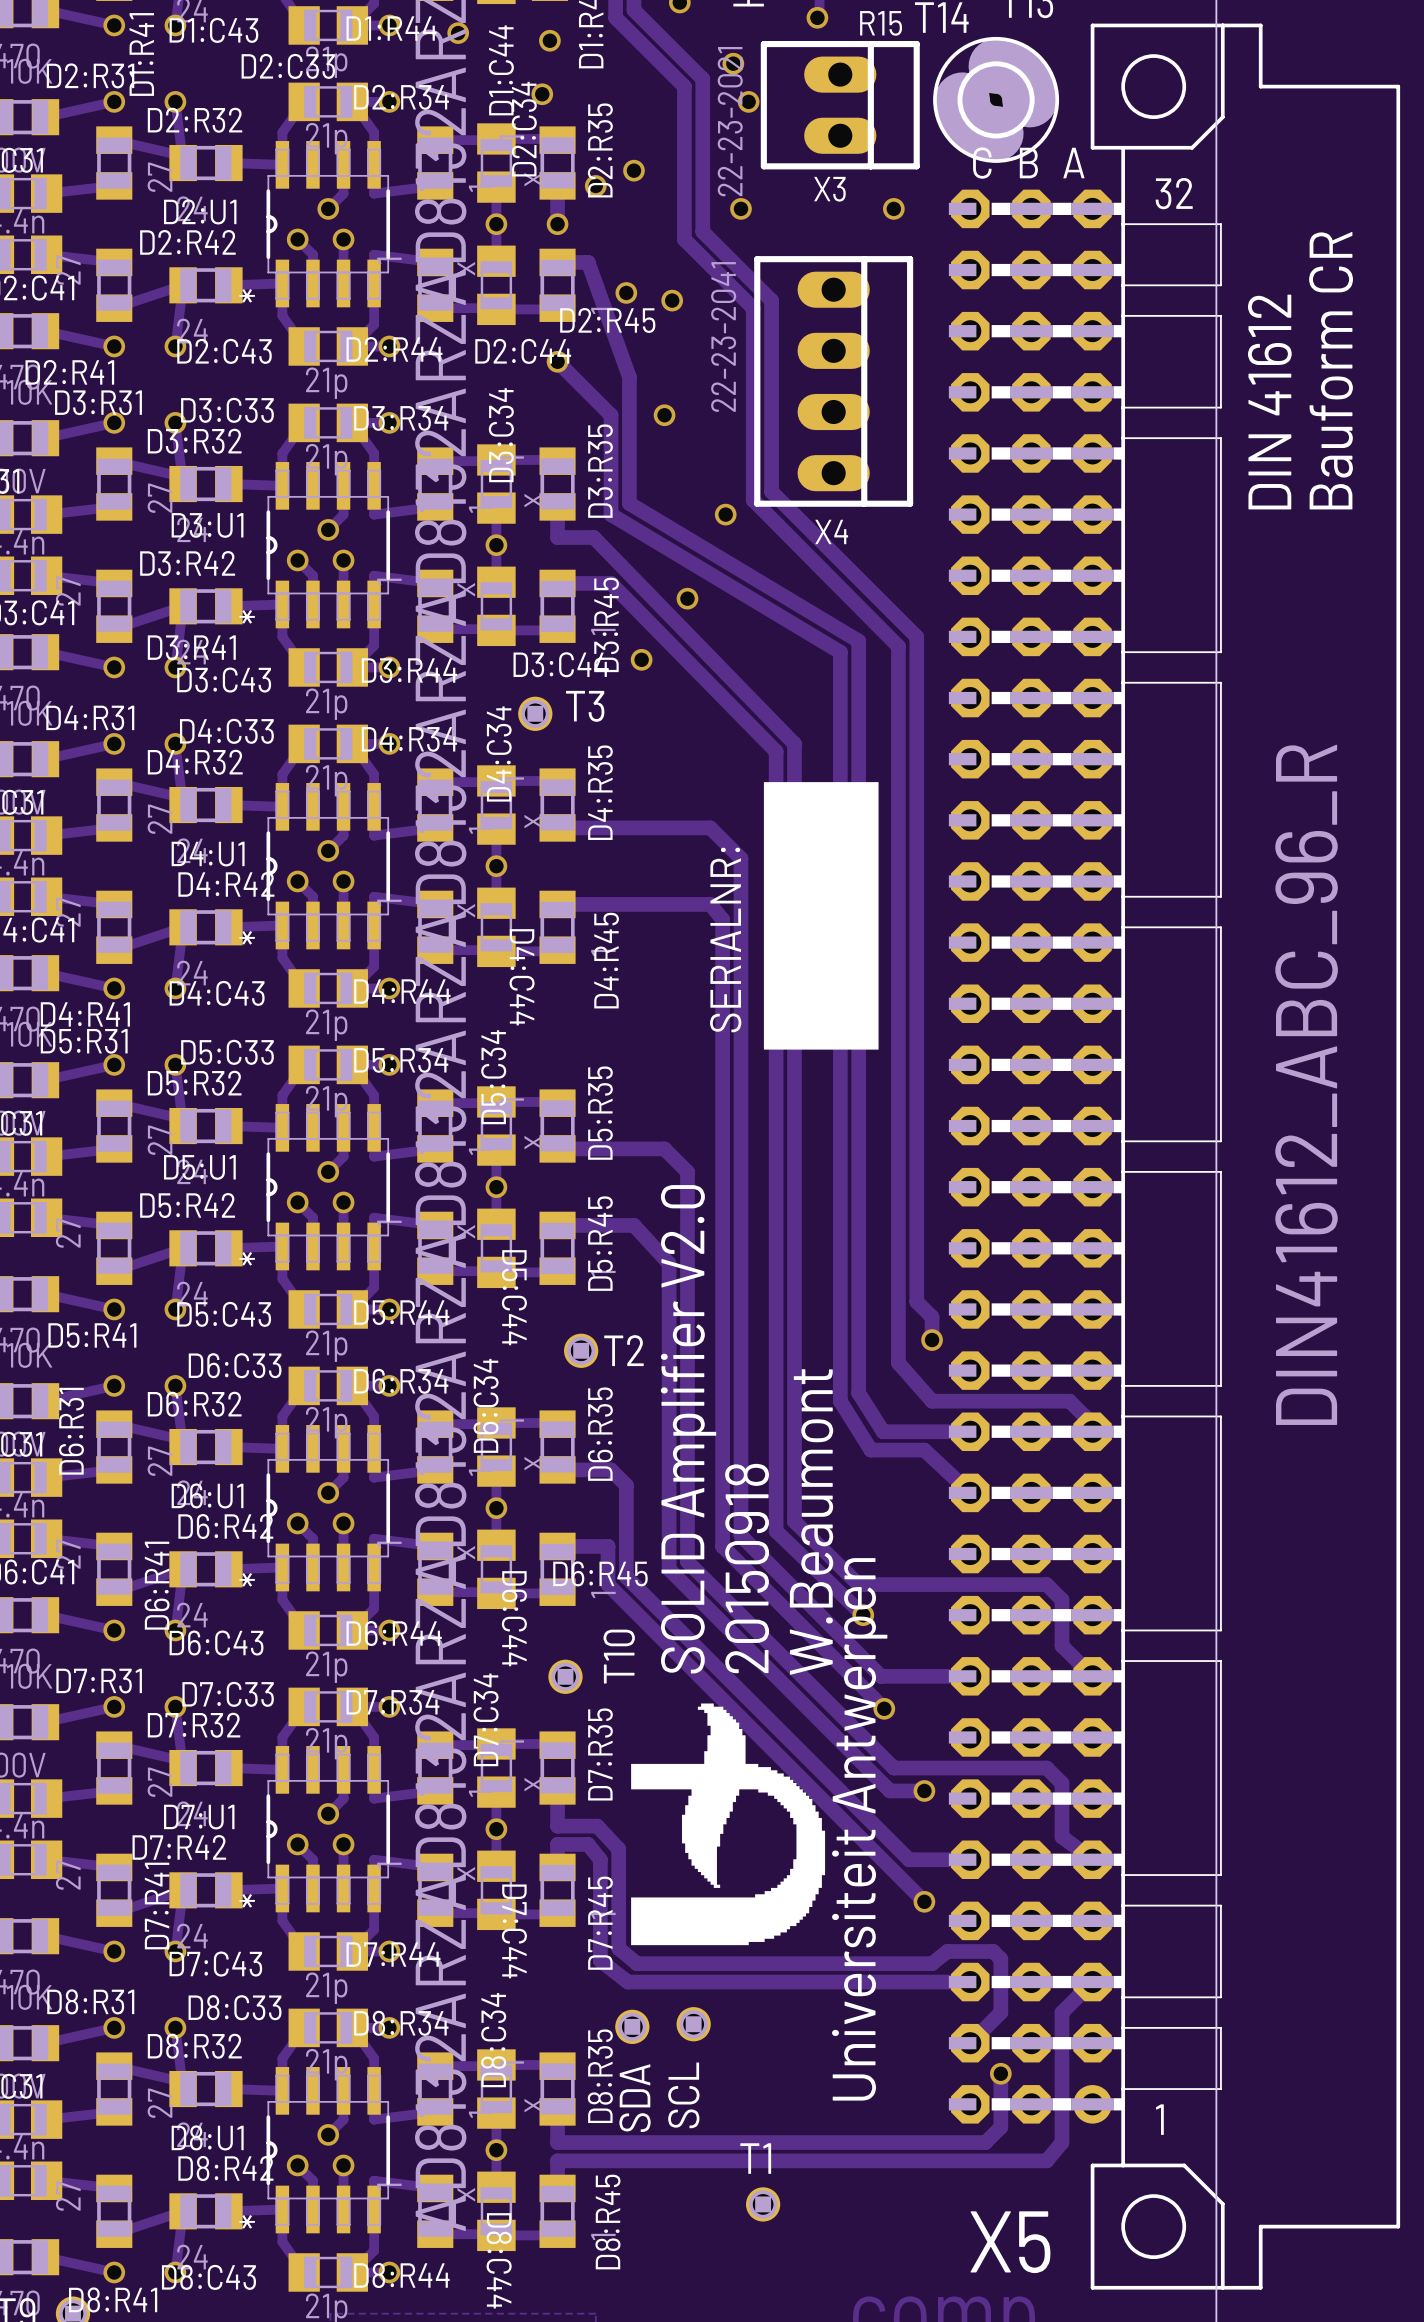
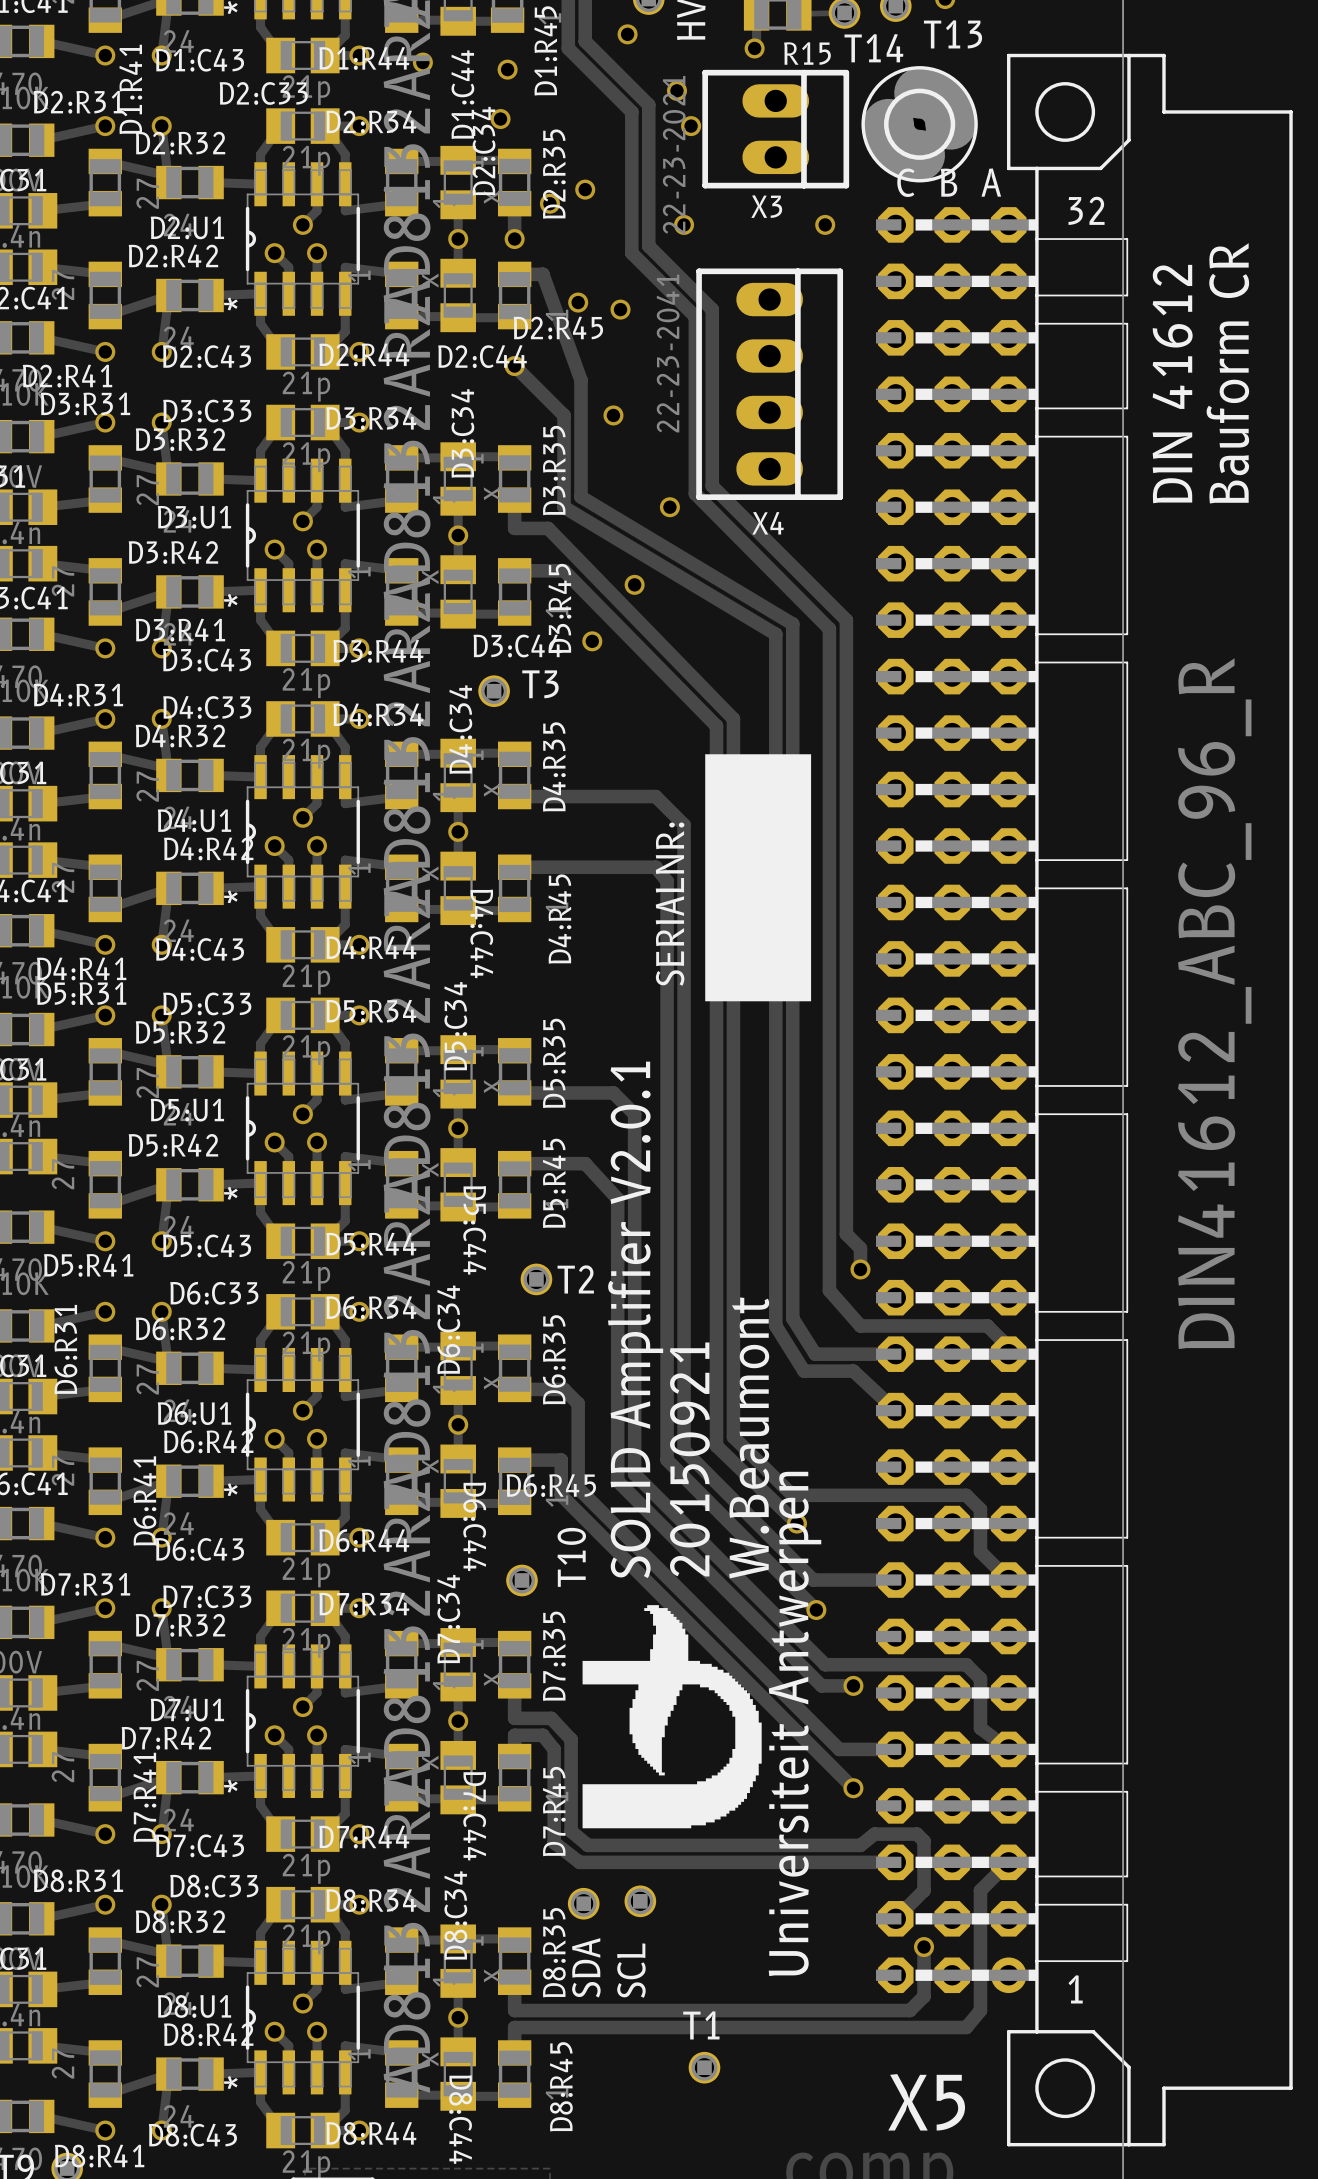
text: SOLID Amplifier V2.0 (688, 1429) -> SOLID Amplifier V2.0.1 (635, 1319)
text: 20150918 (747, 1568) -> 20150921 (689, 1459)

